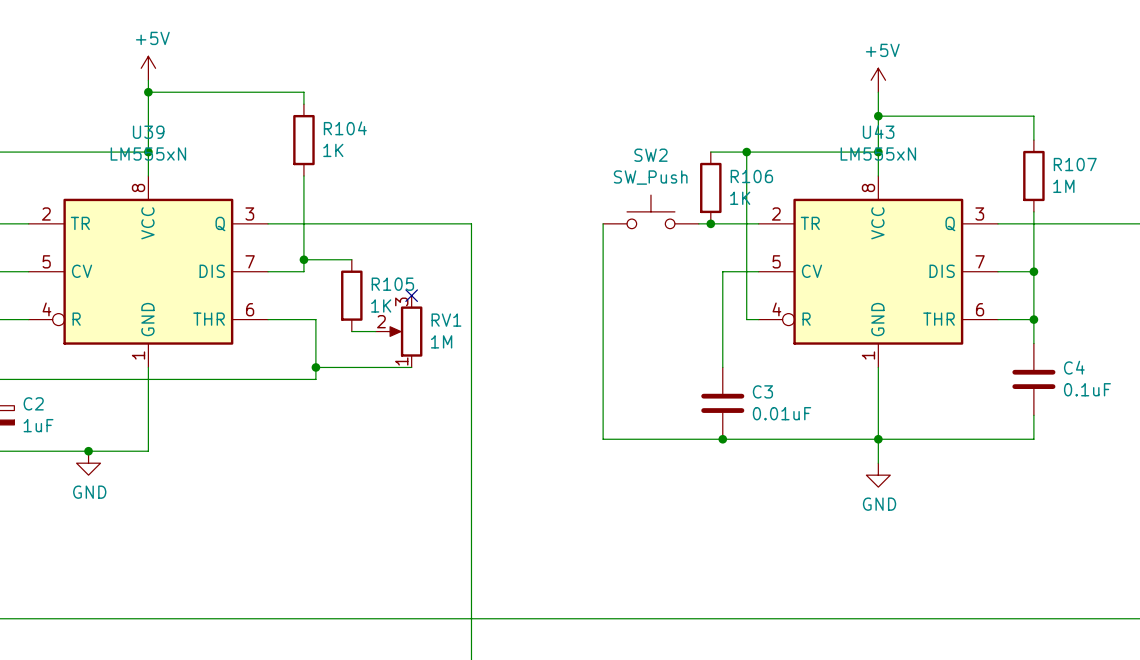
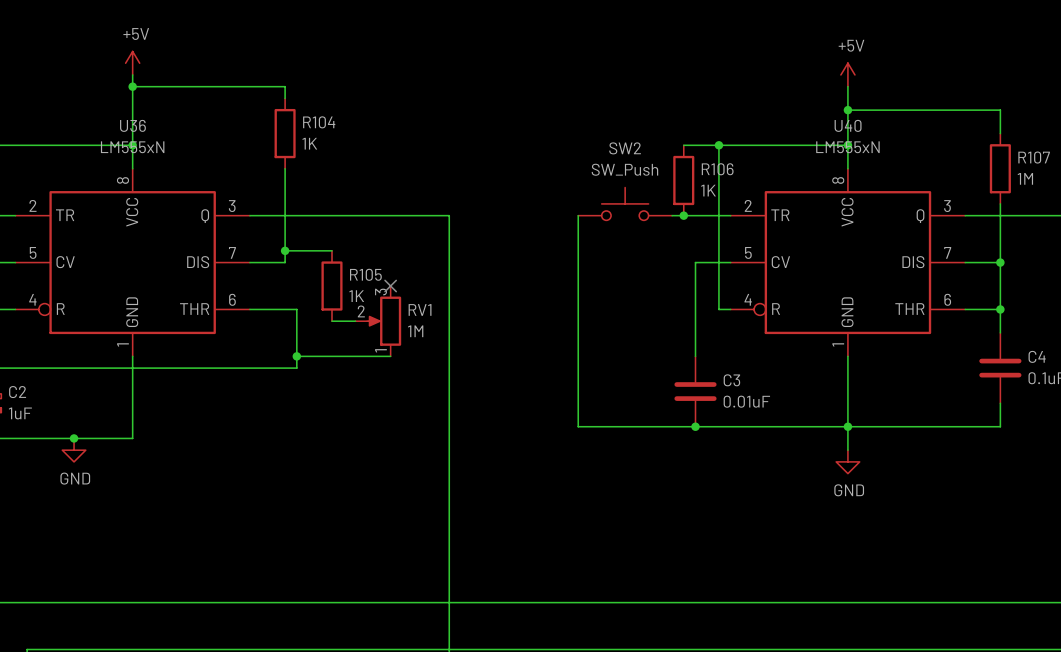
U43 name: U43 (878, 131) -> U40 (848, 125)
U39 name: U39 (148, 132) -> U36 (132, 125)

